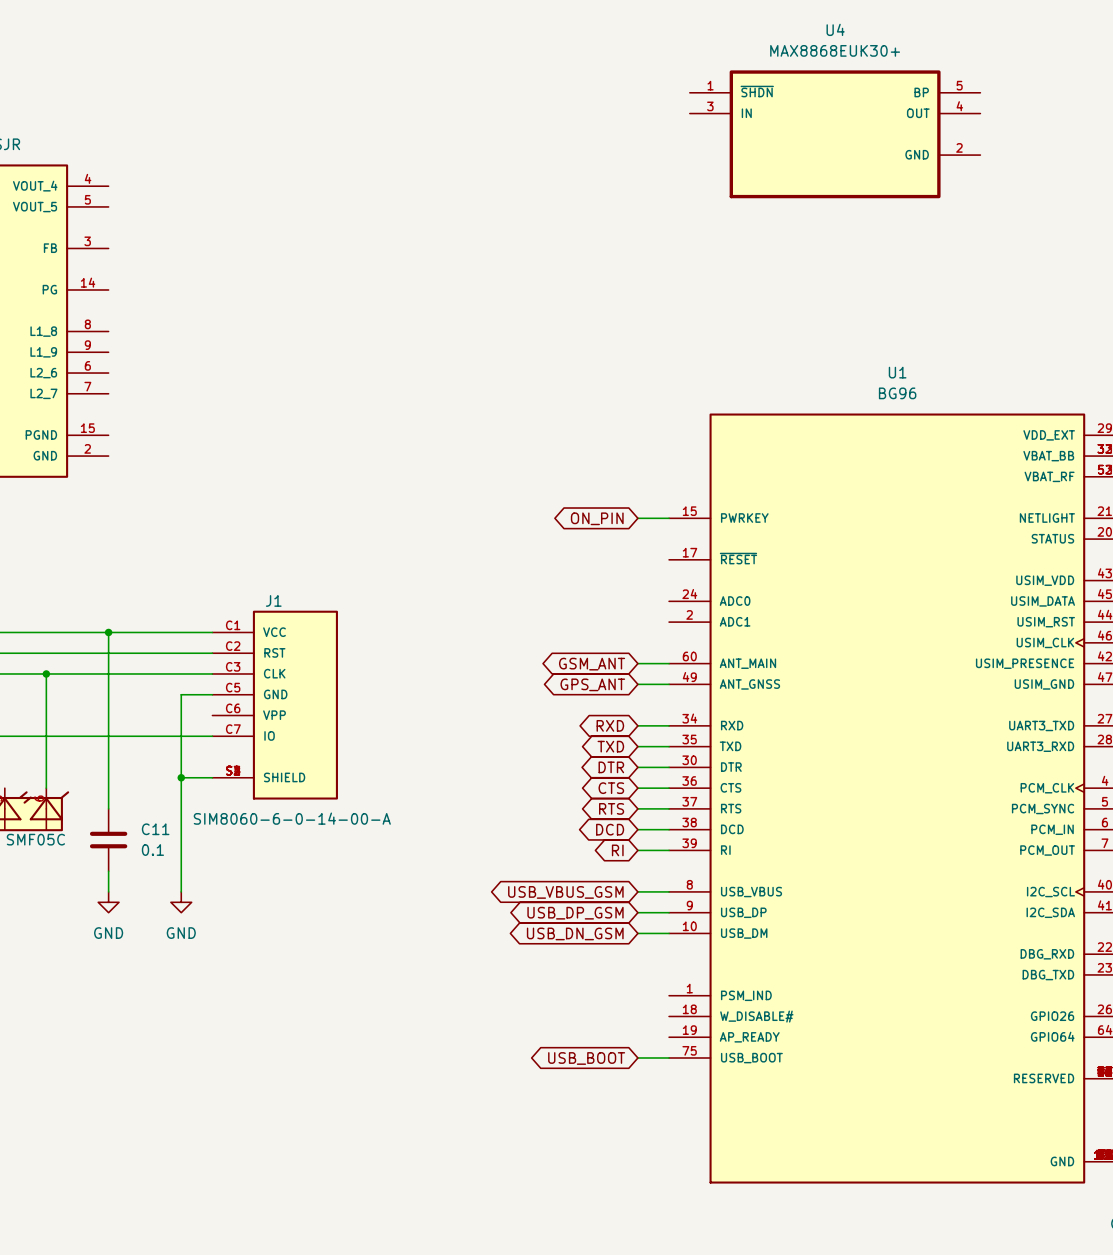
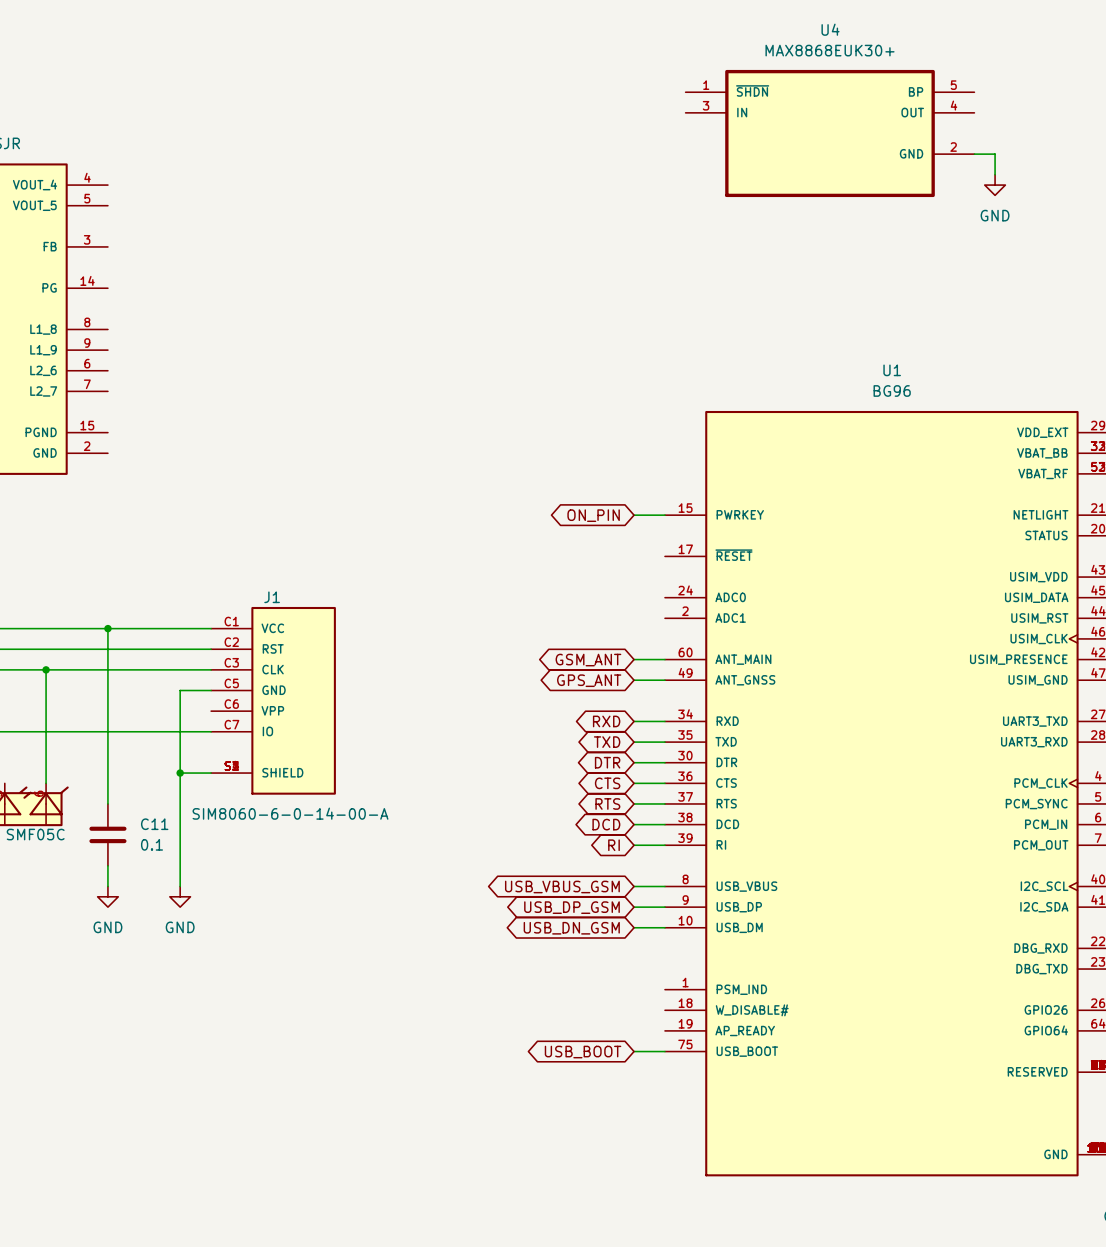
wire: none -> (974, 154) (995, 154) (995, 174)
power symbol: none -> GND (995, 185)

